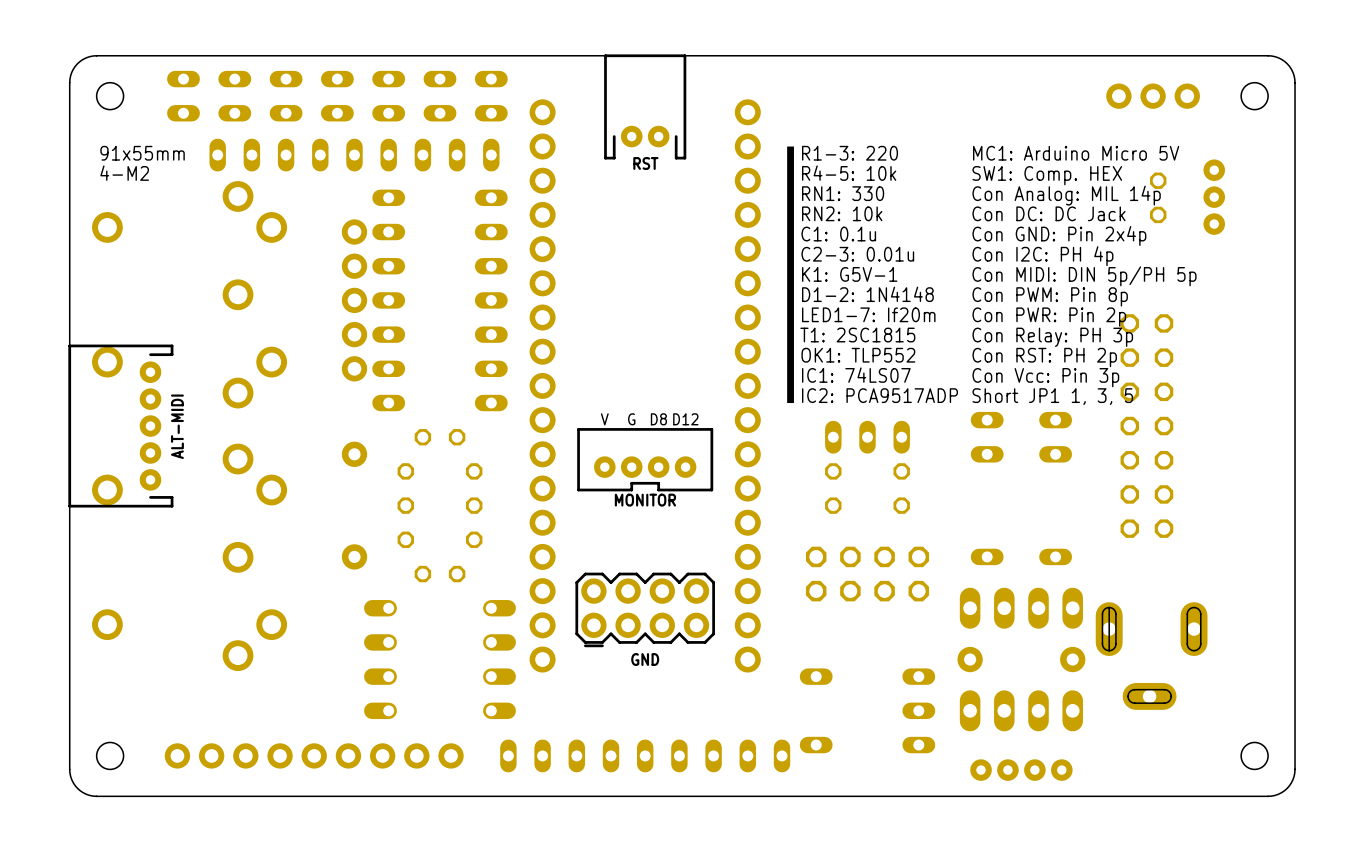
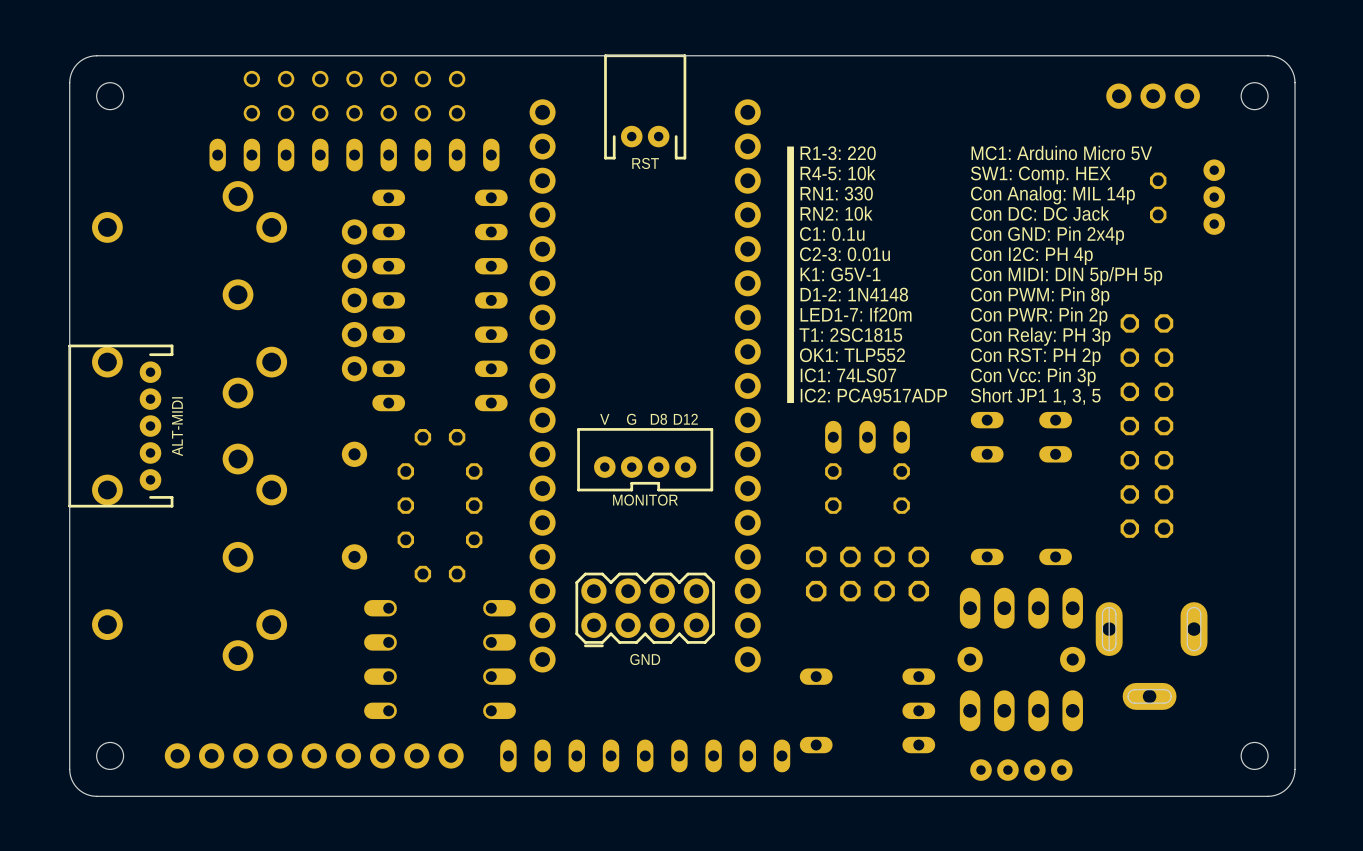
part footprint: [269, 70, 303, 122] -> [277, 70, 295, 122]
part footprint: [372, 70, 406, 122] -> [380, 70, 397, 122]
part: (183, 96) -> none
part: (234, 96) -> none
part: none -> (251, 96)
part: none -> (320, 96)
part: (337, 96) -> none
part: none -> (354, 96)
part: none -> (422, 96)
part: (440, 96) -> none
part: none -> (457, 96)
part: (491, 96) -> none
text: 91x55mm (142, 153) -> none
text: 4-M2 (124, 173) -> none

